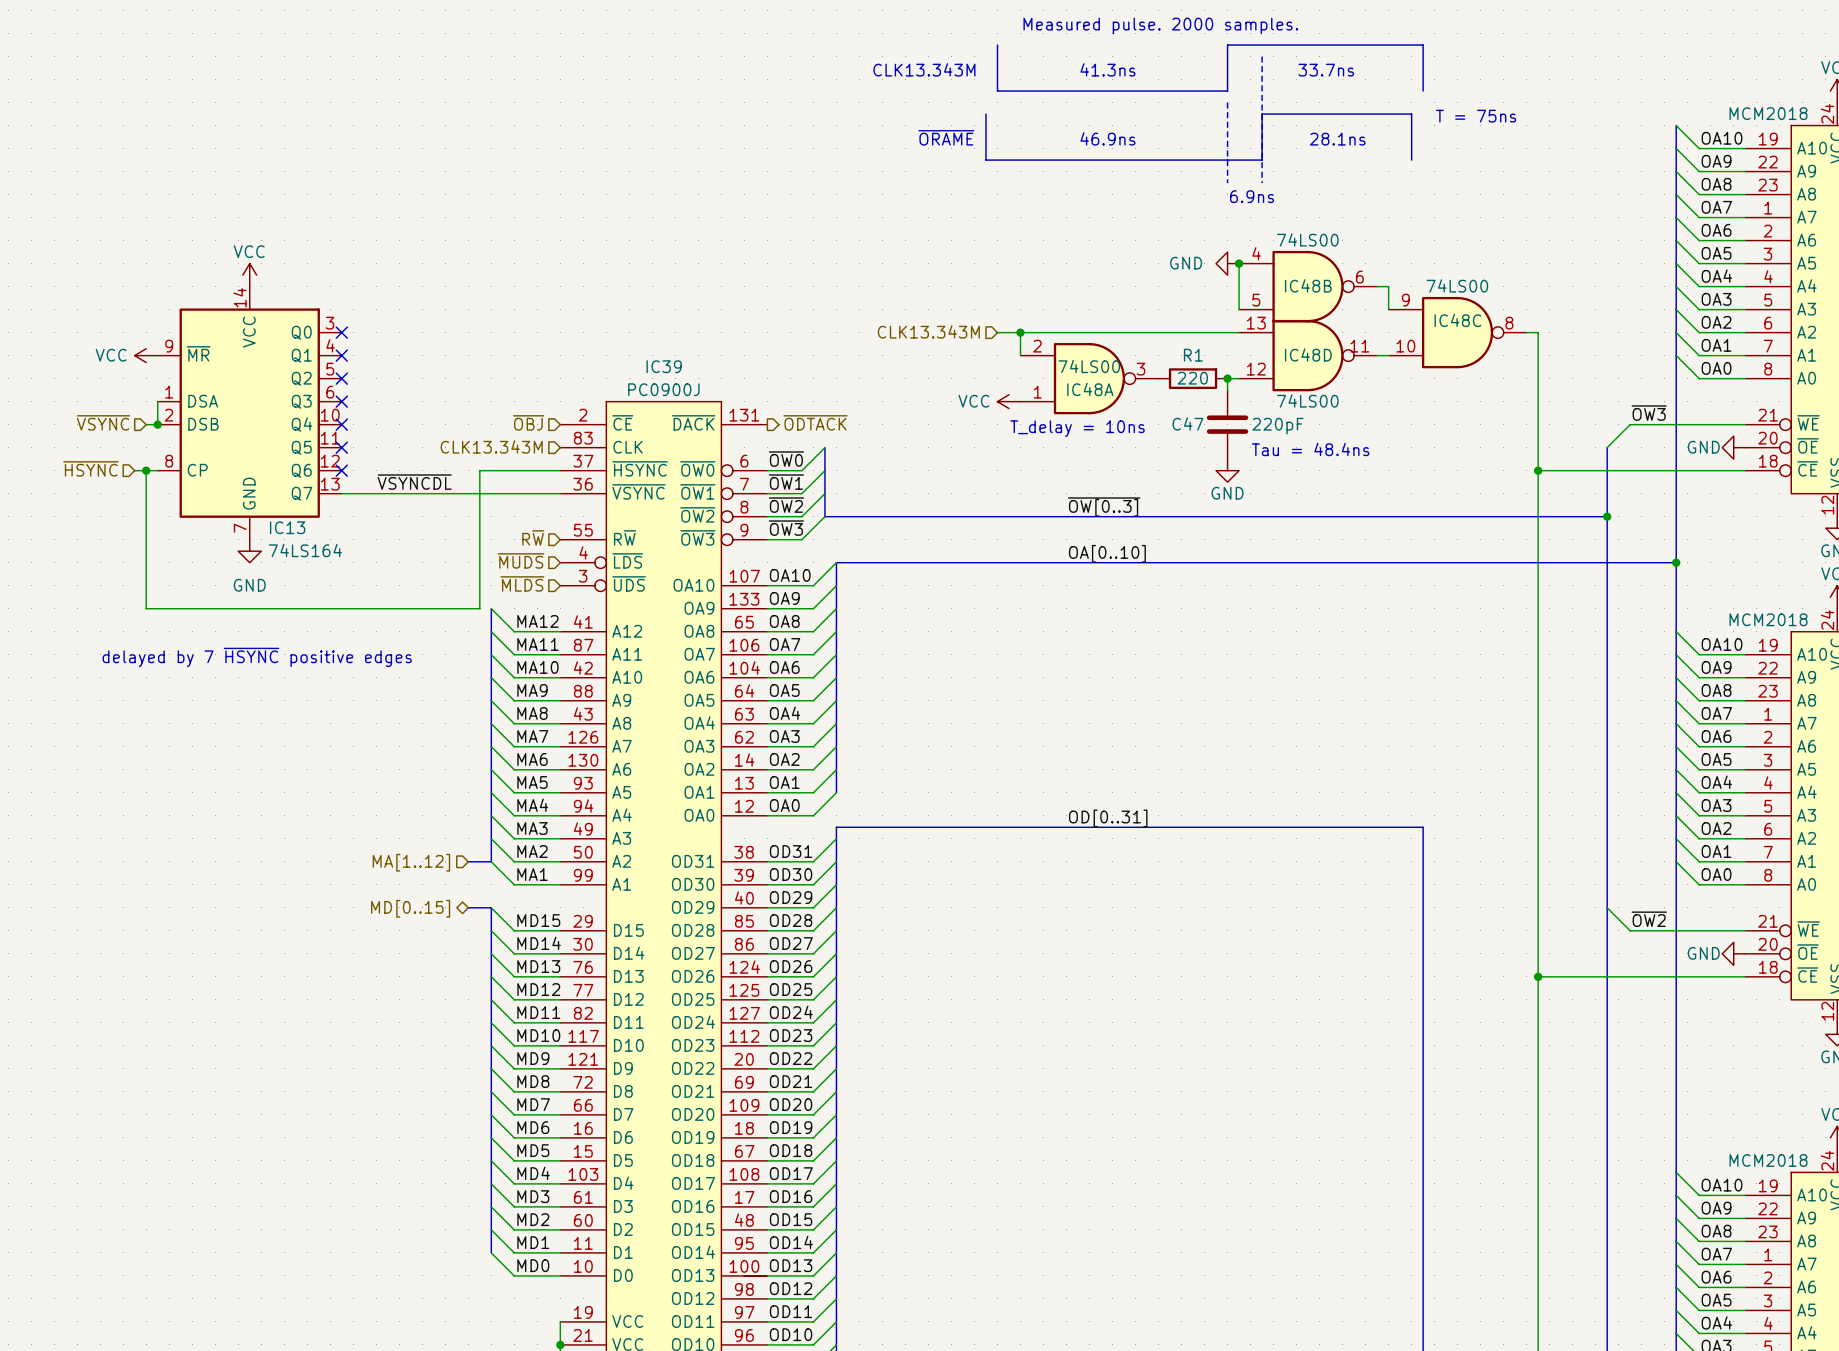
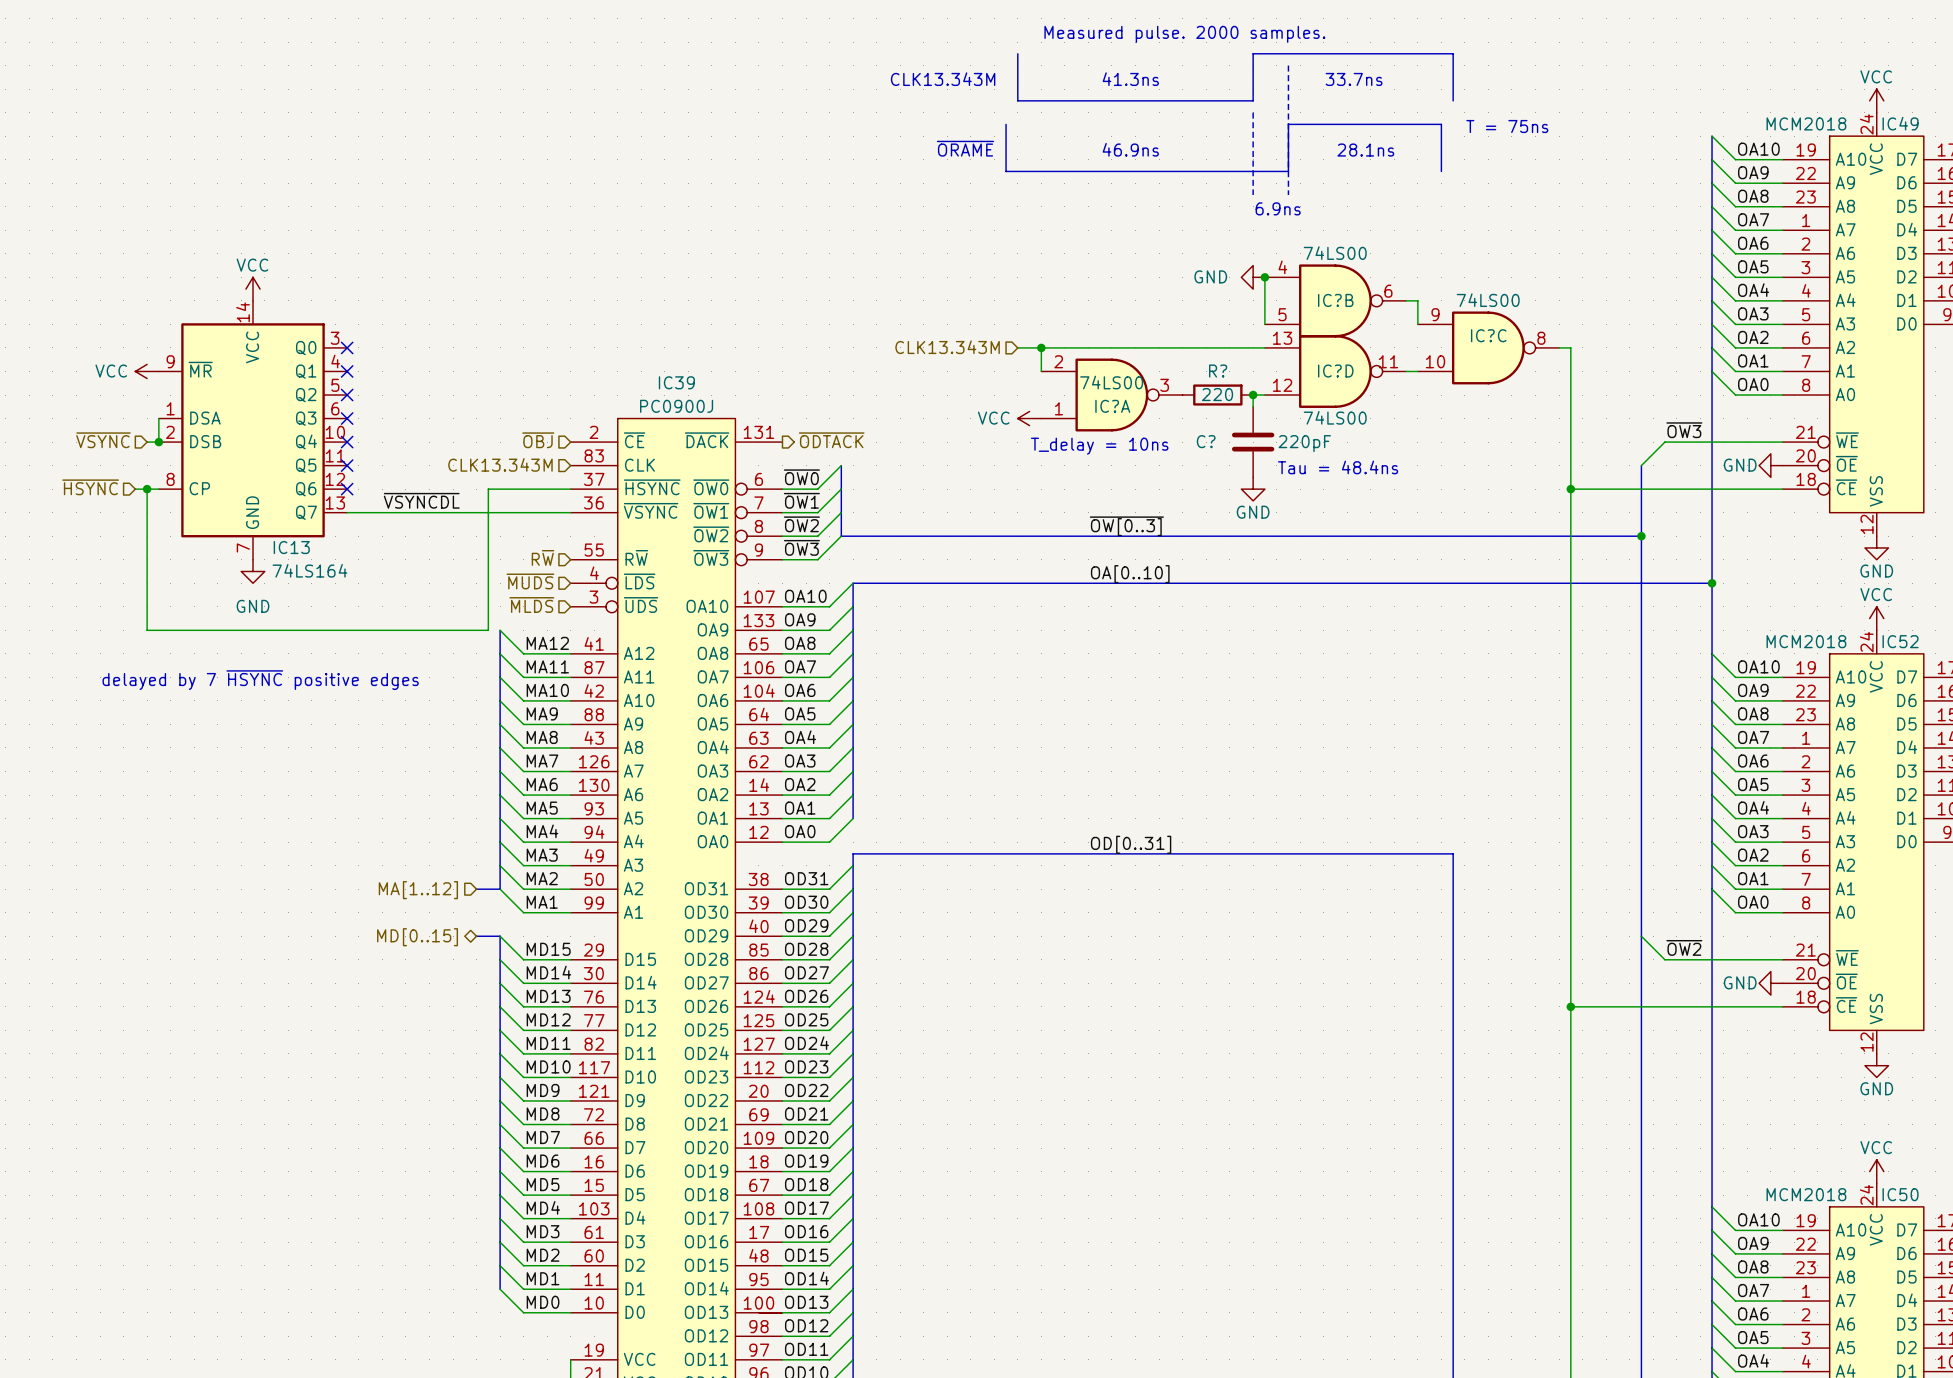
IC48B name: IC48B (1308, 285) -> IC?B (1335, 300)
IC48C name: IC48C (1457, 320) -> IC?C (1488, 335)
IC48D name: IC48D (1308, 354) -> IC?D (1335, 371)
R1 name: R1 (1193, 355) -> R? (1218, 371)
IC48A name: IC48A (1090, 389) -> IC?A (1112, 406)
C47 name: C47 (1187, 423) -> C? (1206, 441)

